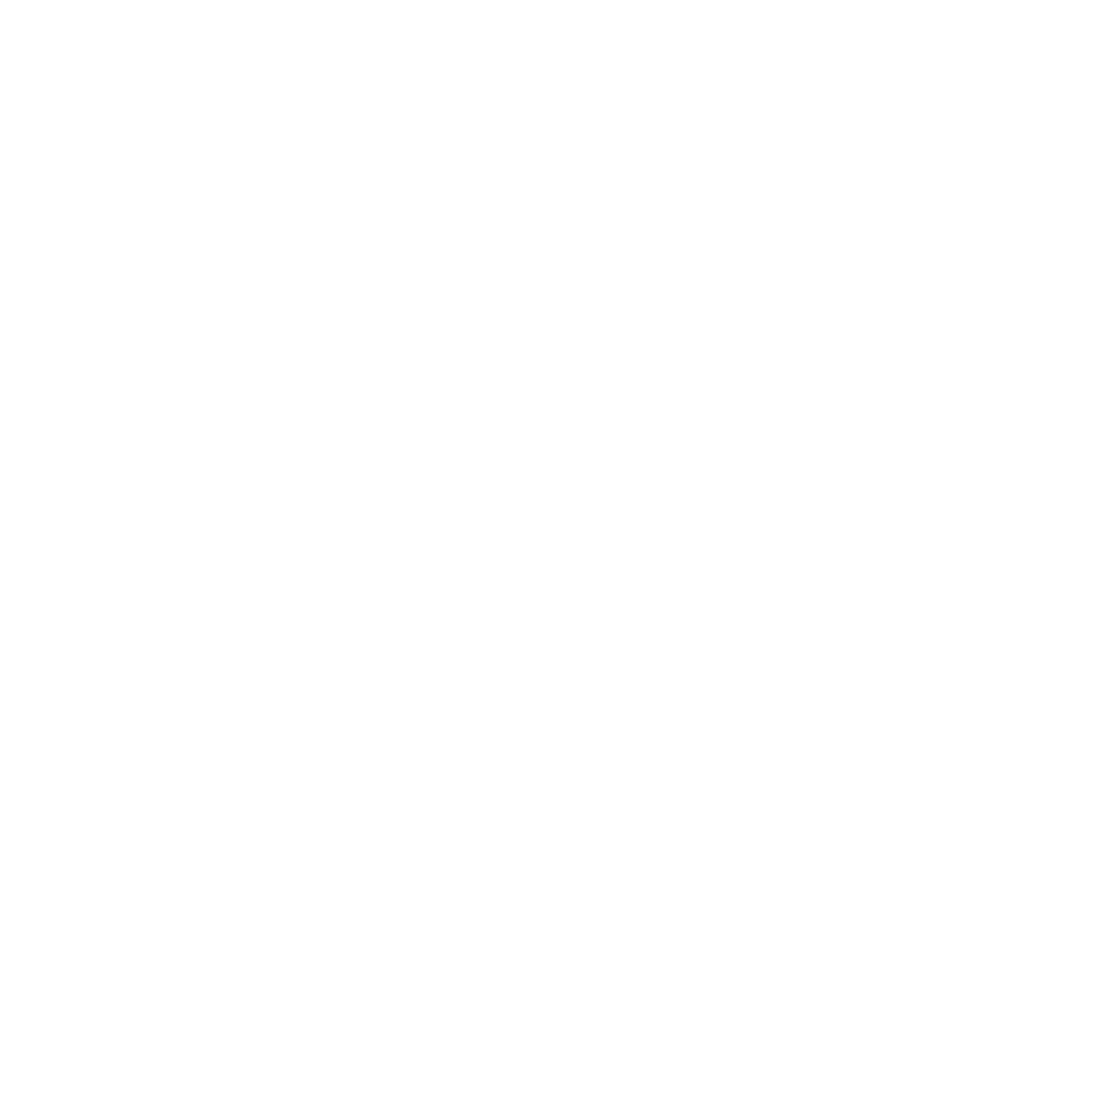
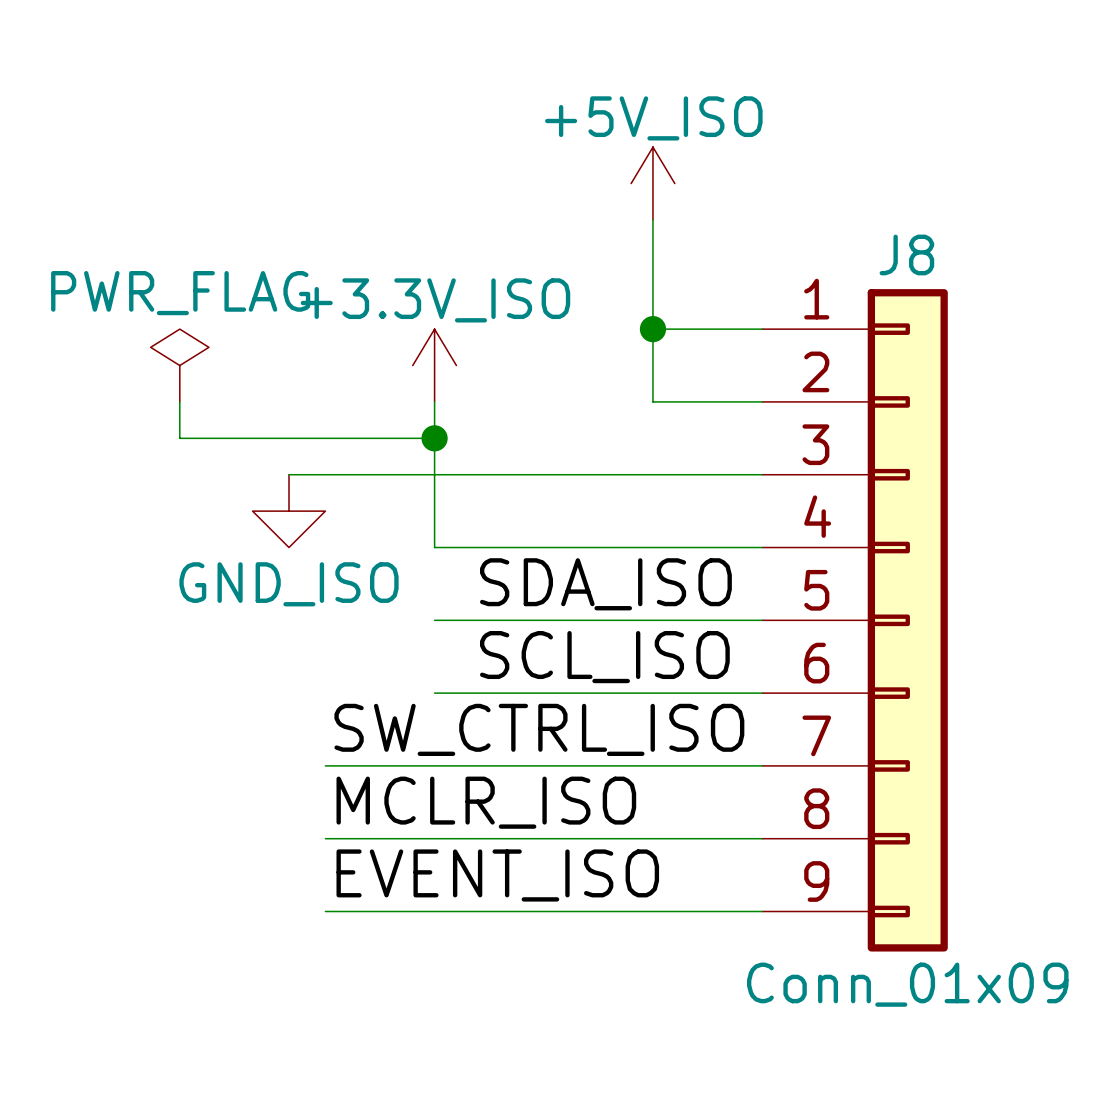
power symbol: none -> +5V_ISO (652, 183)
wire: none -> (652, 219) (652, 401) (762, 401)
wire: none -> (652, 329) (762, 329)
junction: none -> (652, 329)
power symbol: none -> PWR_FLAG (179, 365)
power symbol: none -> +3.3V_ISO (434, 365)
wire: none -> (179, 401) (179, 438) (434, 438)
wire: none -> (434, 401) (434, 547) (762, 547)
junction: none -> (434, 438)
wire: none -> (289, 474) (762, 474)
power symbol: none -> GND_ISO (289, 511)
label: none -> SDA_ISO (605, 584)
wire: none -> (434, 620) (762, 620)
J8: none -> Conn_01x09 (854, 620)
label: none -> SCL_ISO (604, 657)
wire: none -> (434, 693) (762, 693)
label: none -> SW_CTRL_ISO (539, 729)
wire: none -> (325, 765) (762, 765)
label: none -> MCLR_ISO (486, 802)
wire: none -> (325, 838) (762, 838)
label: none -> EVENT_ISO (497, 875)
wire: none -> (325, 911) (762, 911)

